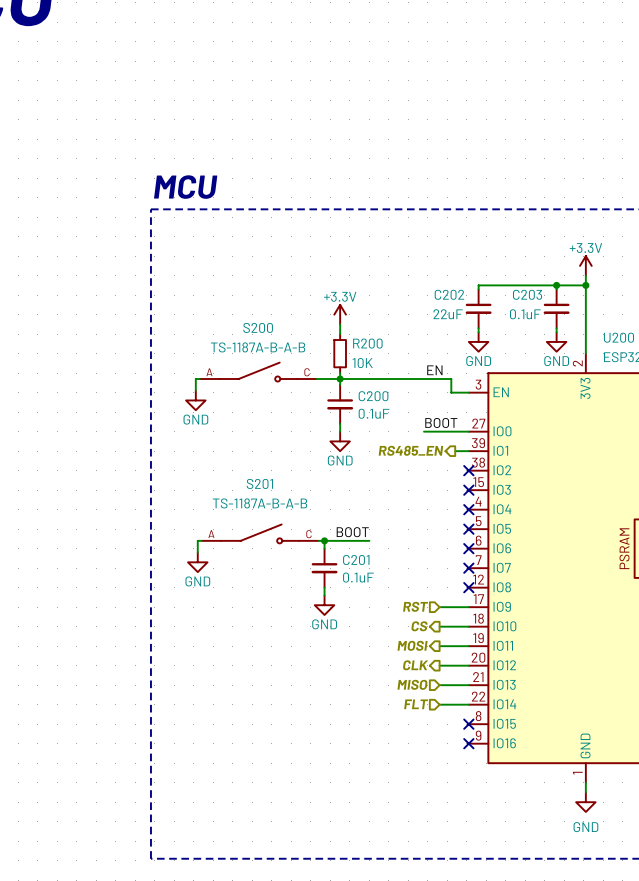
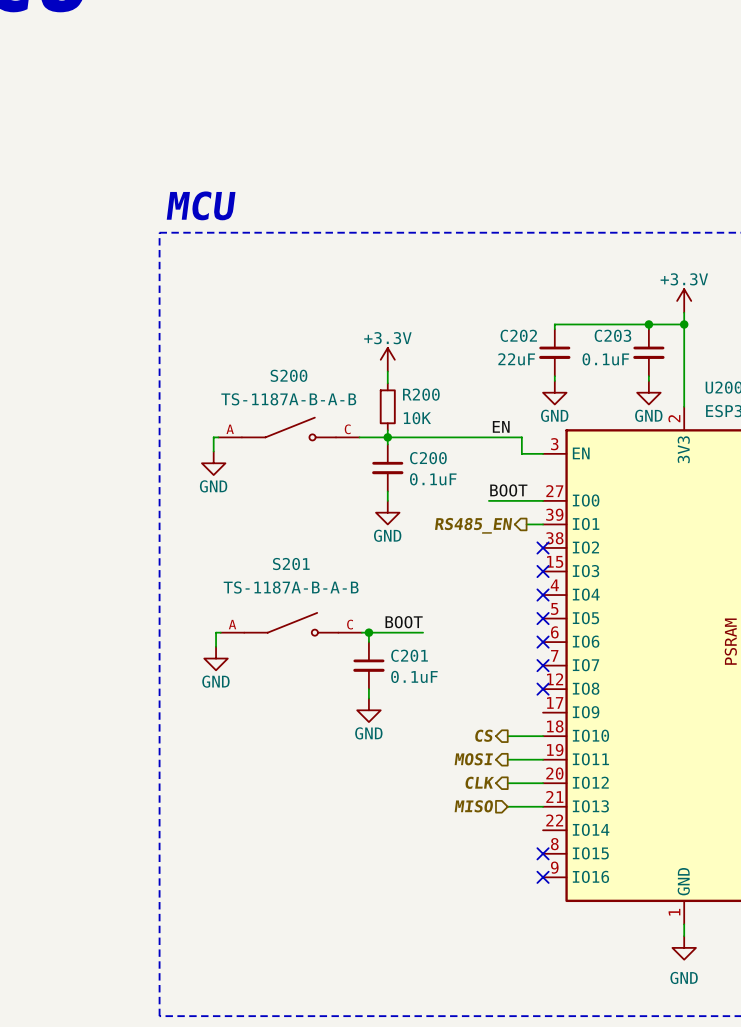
hierarchical label: RST (415, 606) -> none
wire: (439, 607) (468, 607) -> none
hierarchical label: FLT (416, 704) -> none
wire: (439, 704) (468, 704) -> none

